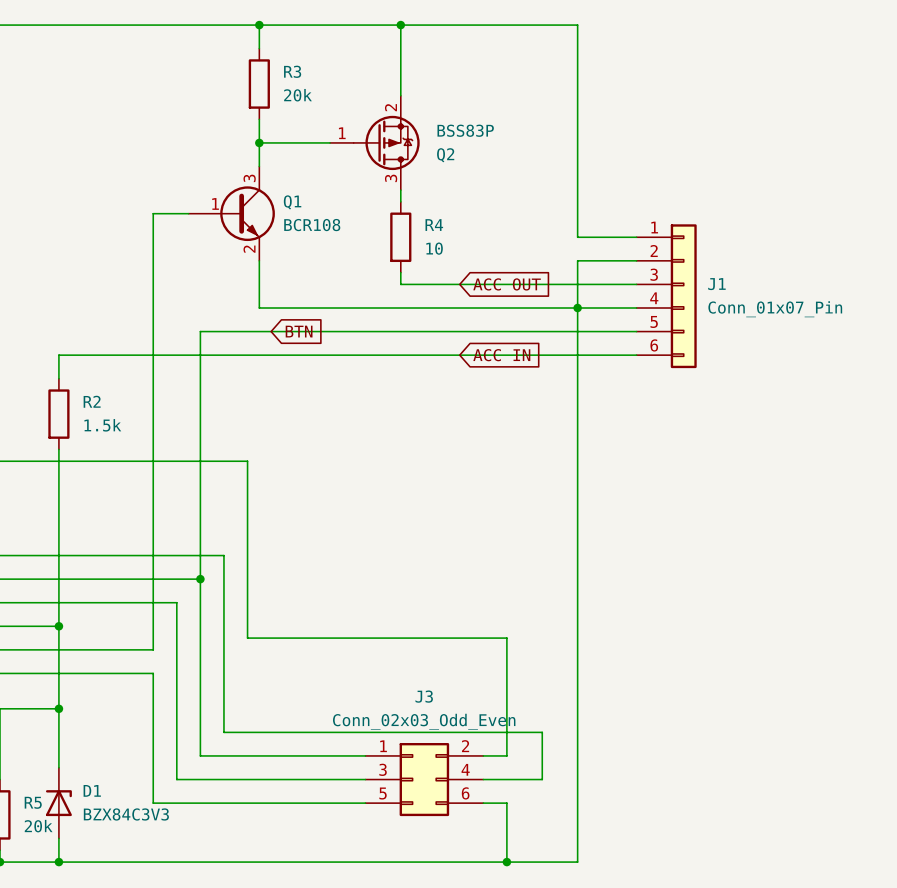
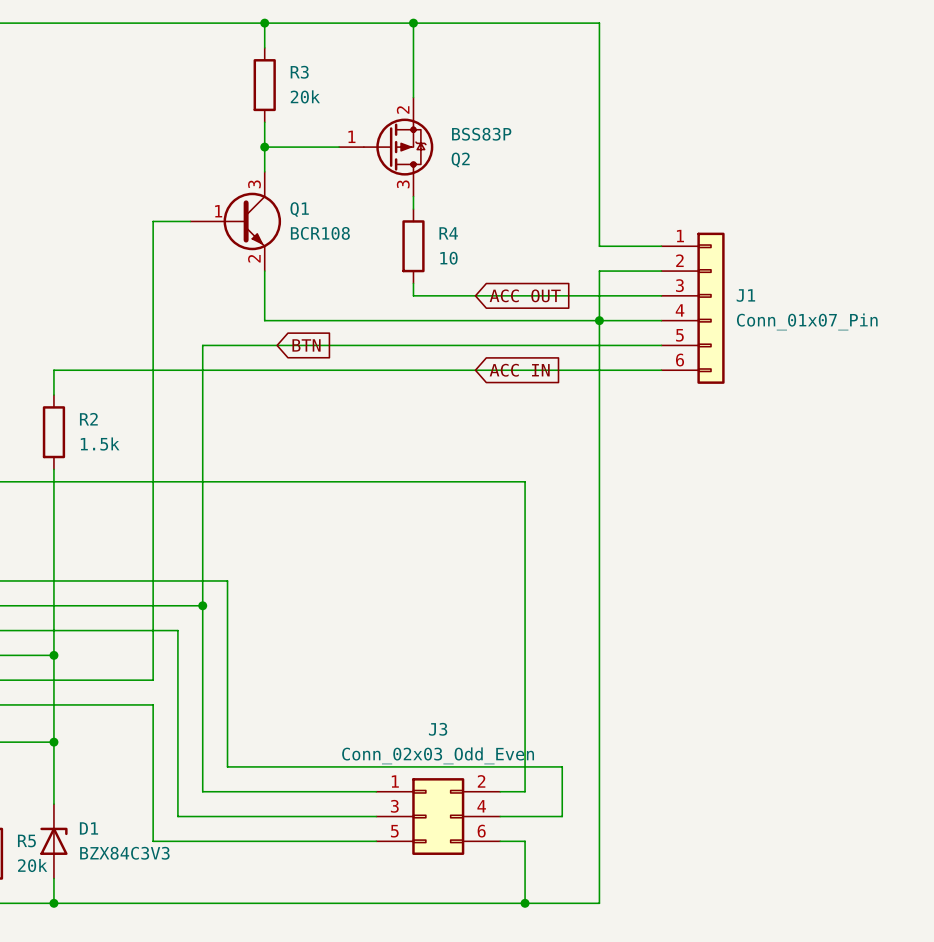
wire: (247, 461) (247, 638) (506, 638) -> (252, 481) (525, 481) (525, 667)

